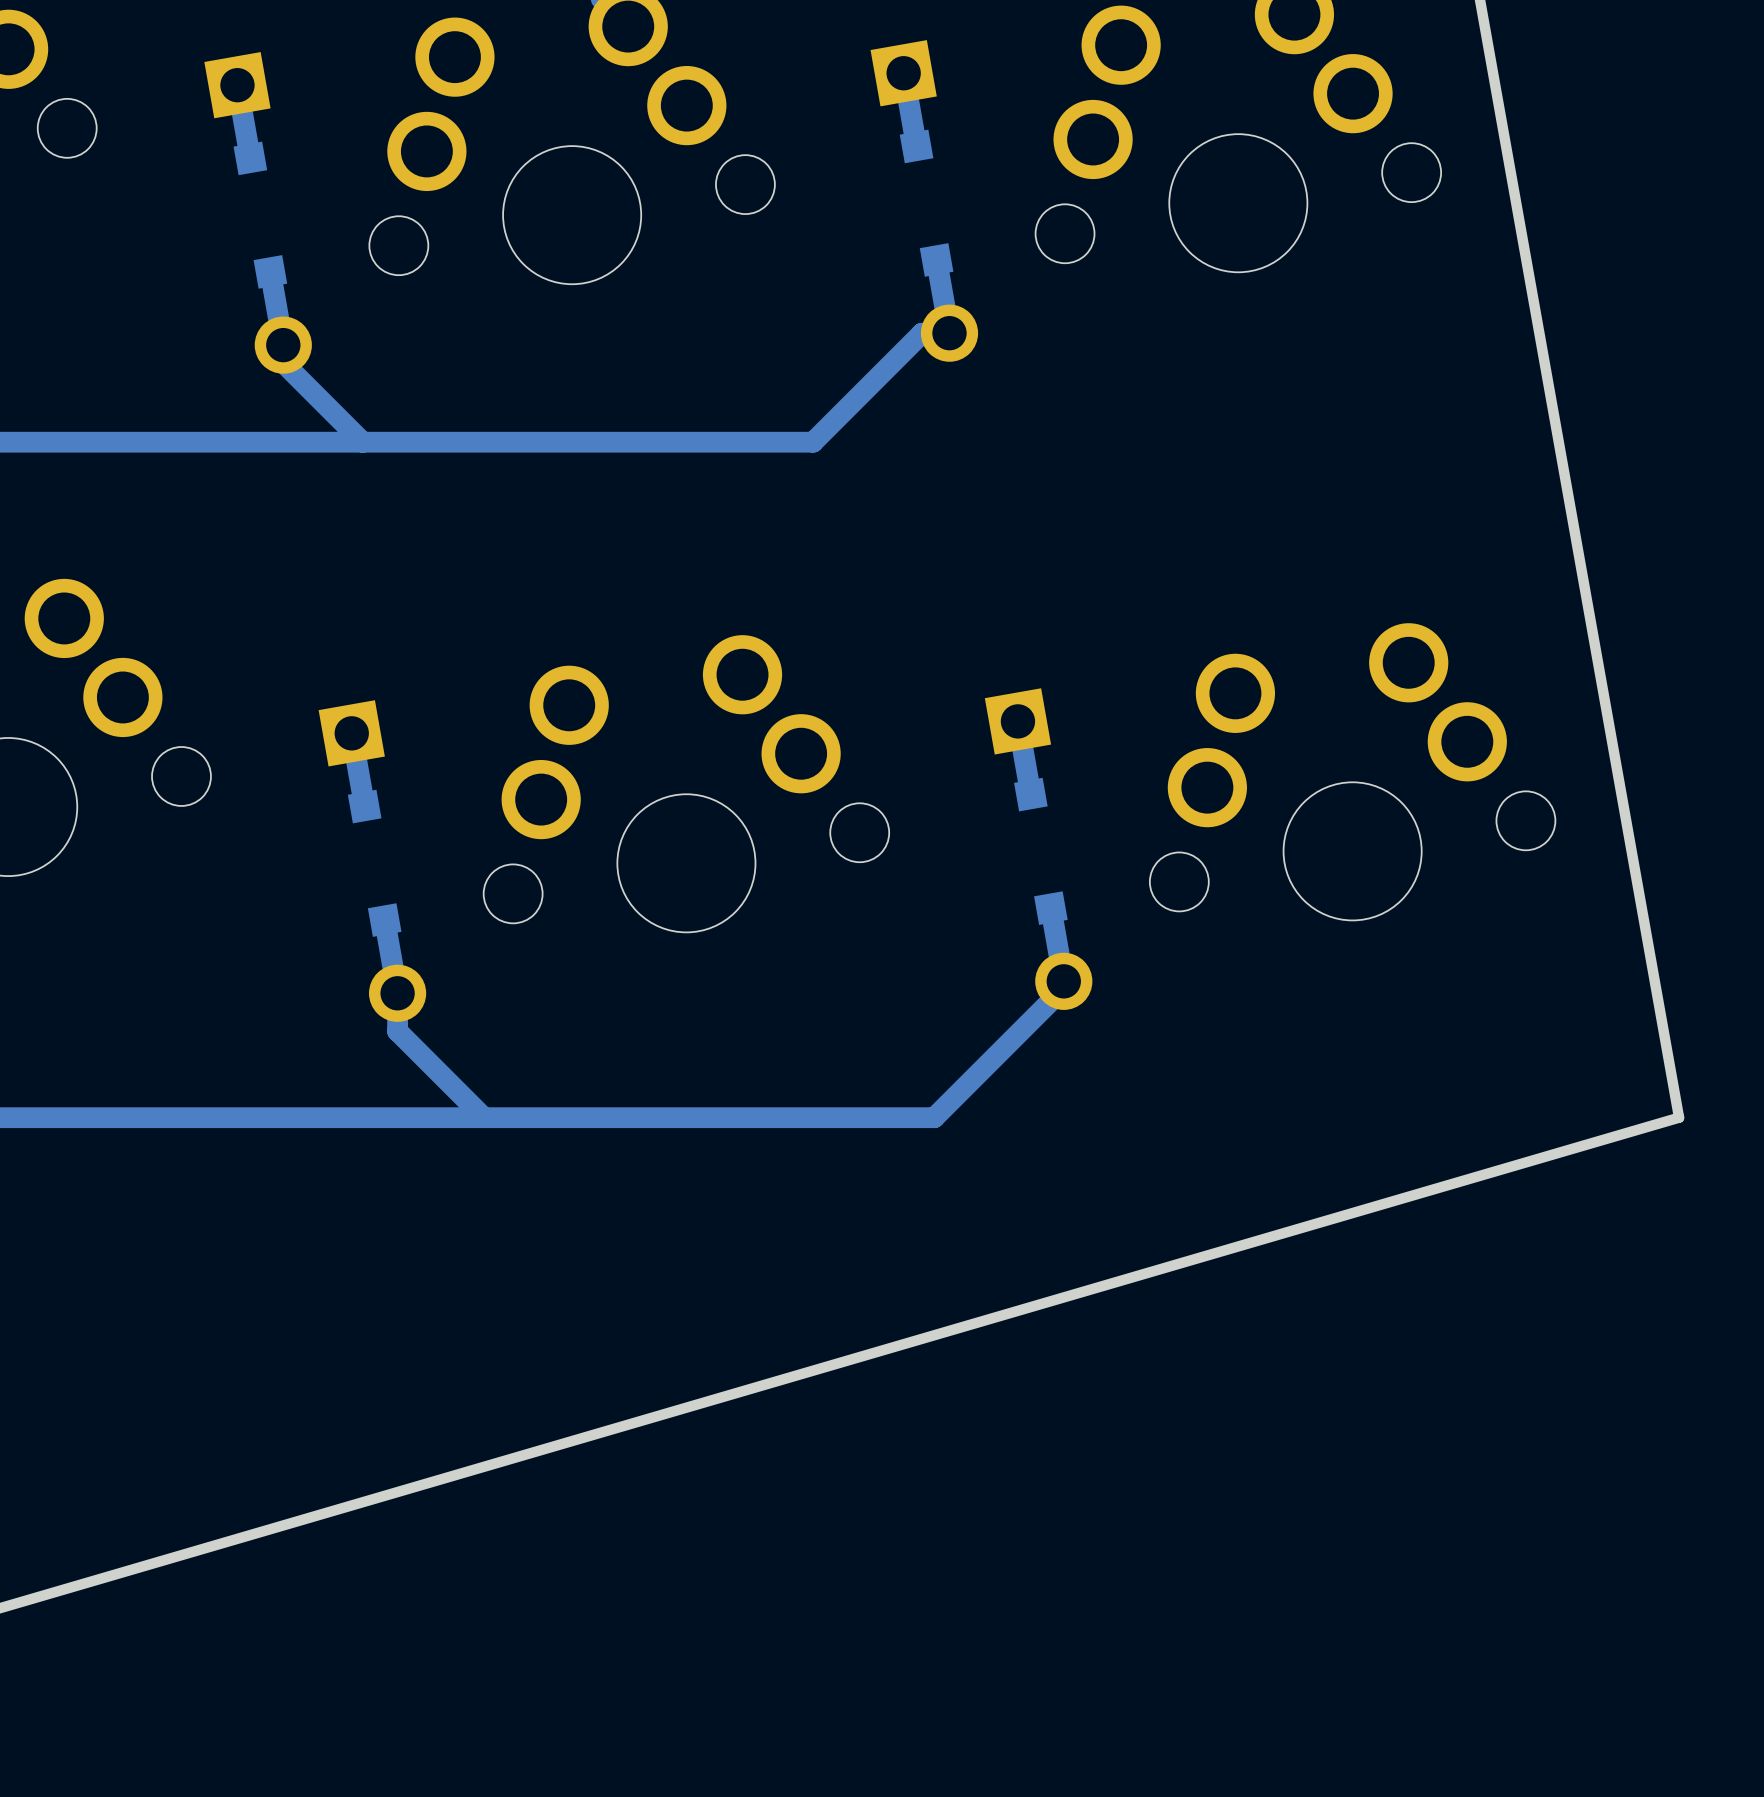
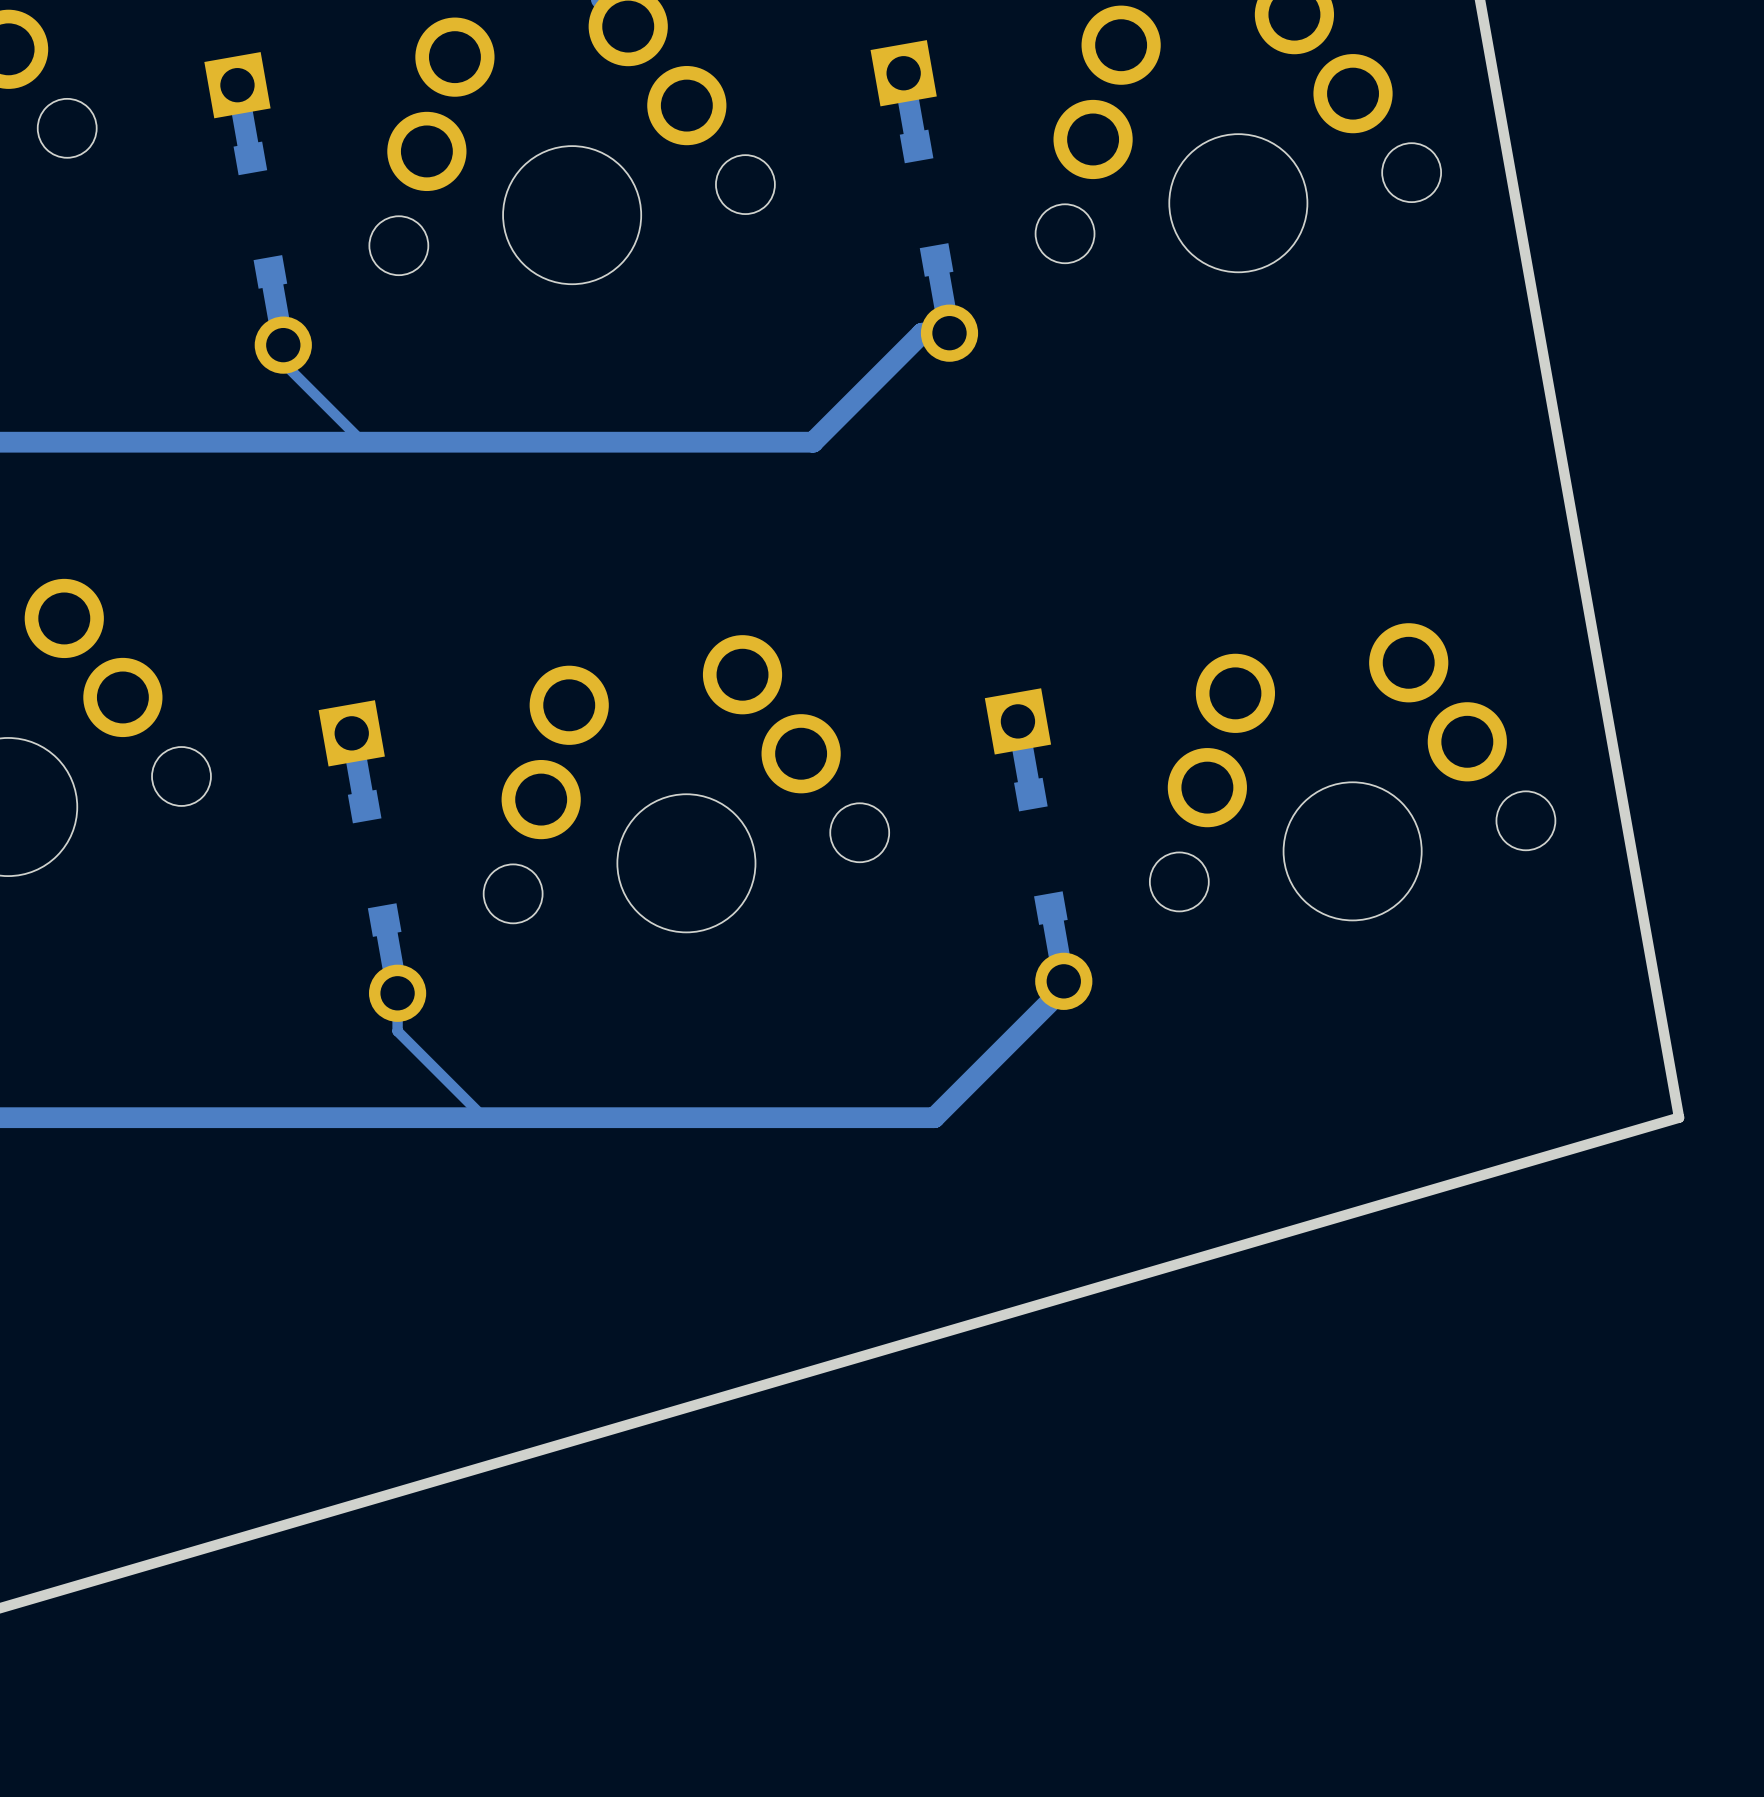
track width: thick (283, 345) (283, 362) (362, 442) -> thin (283, 345) (283, 362) (362, 442)
track width: thick (397, 993) (397, 1031) (484, 1117) -> thin (397, 993) (397, 1031) (484, 1117)

